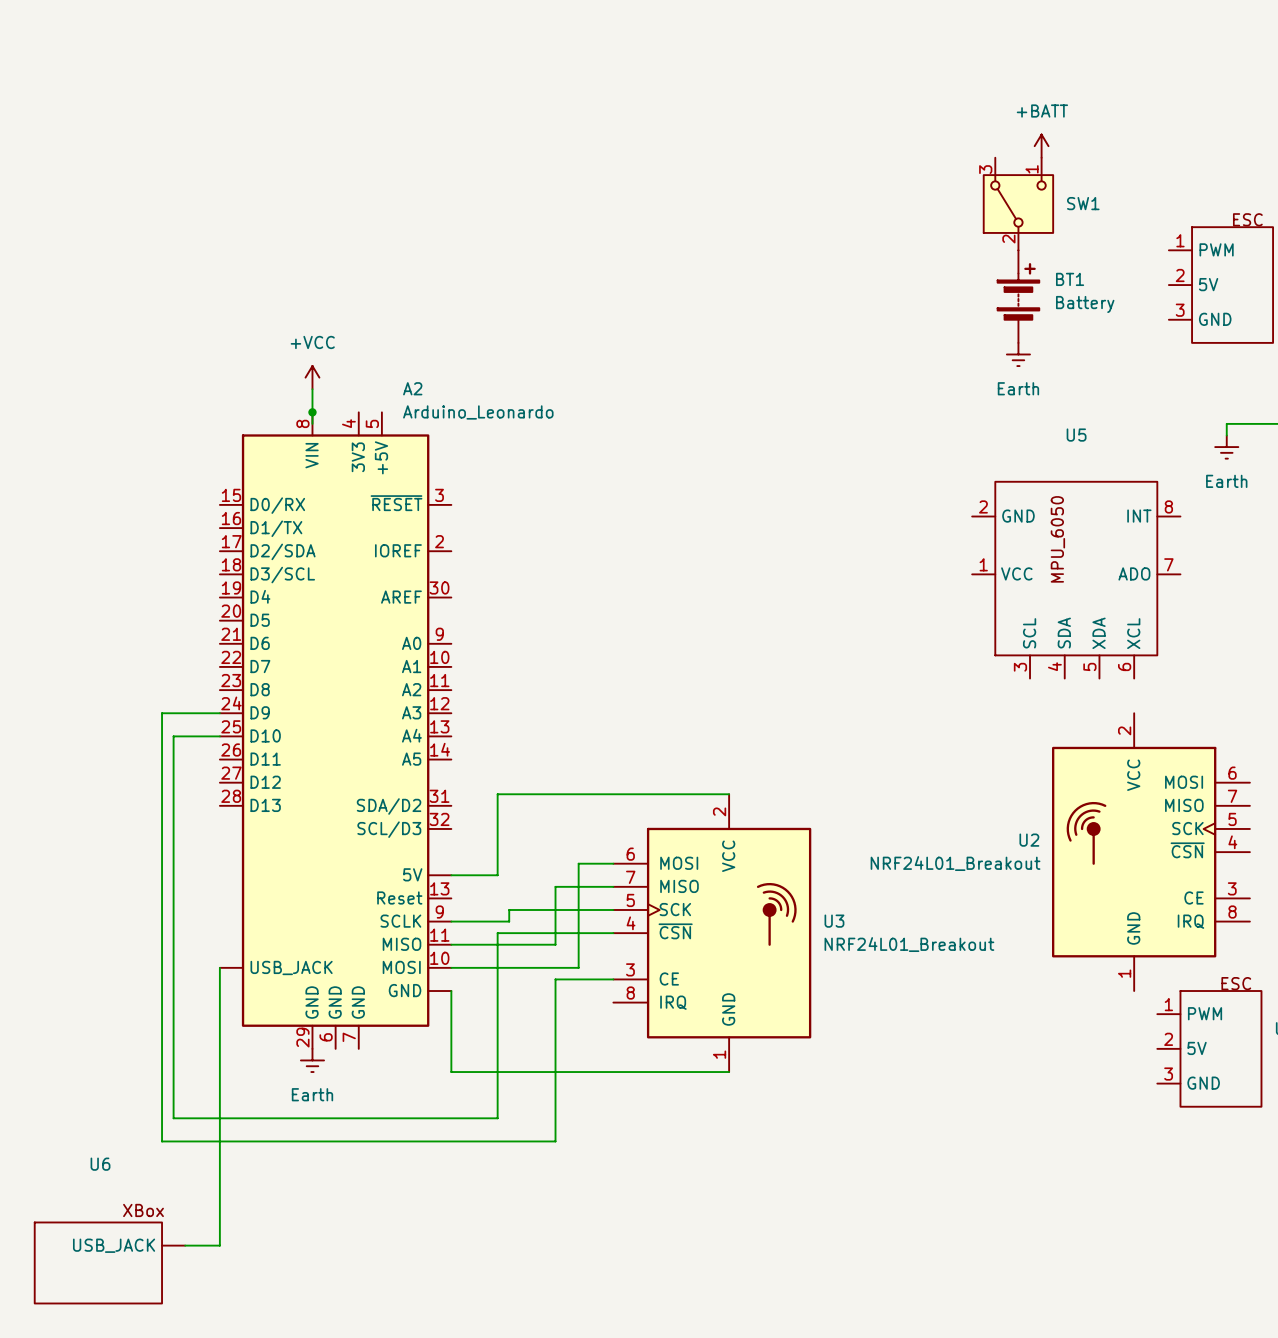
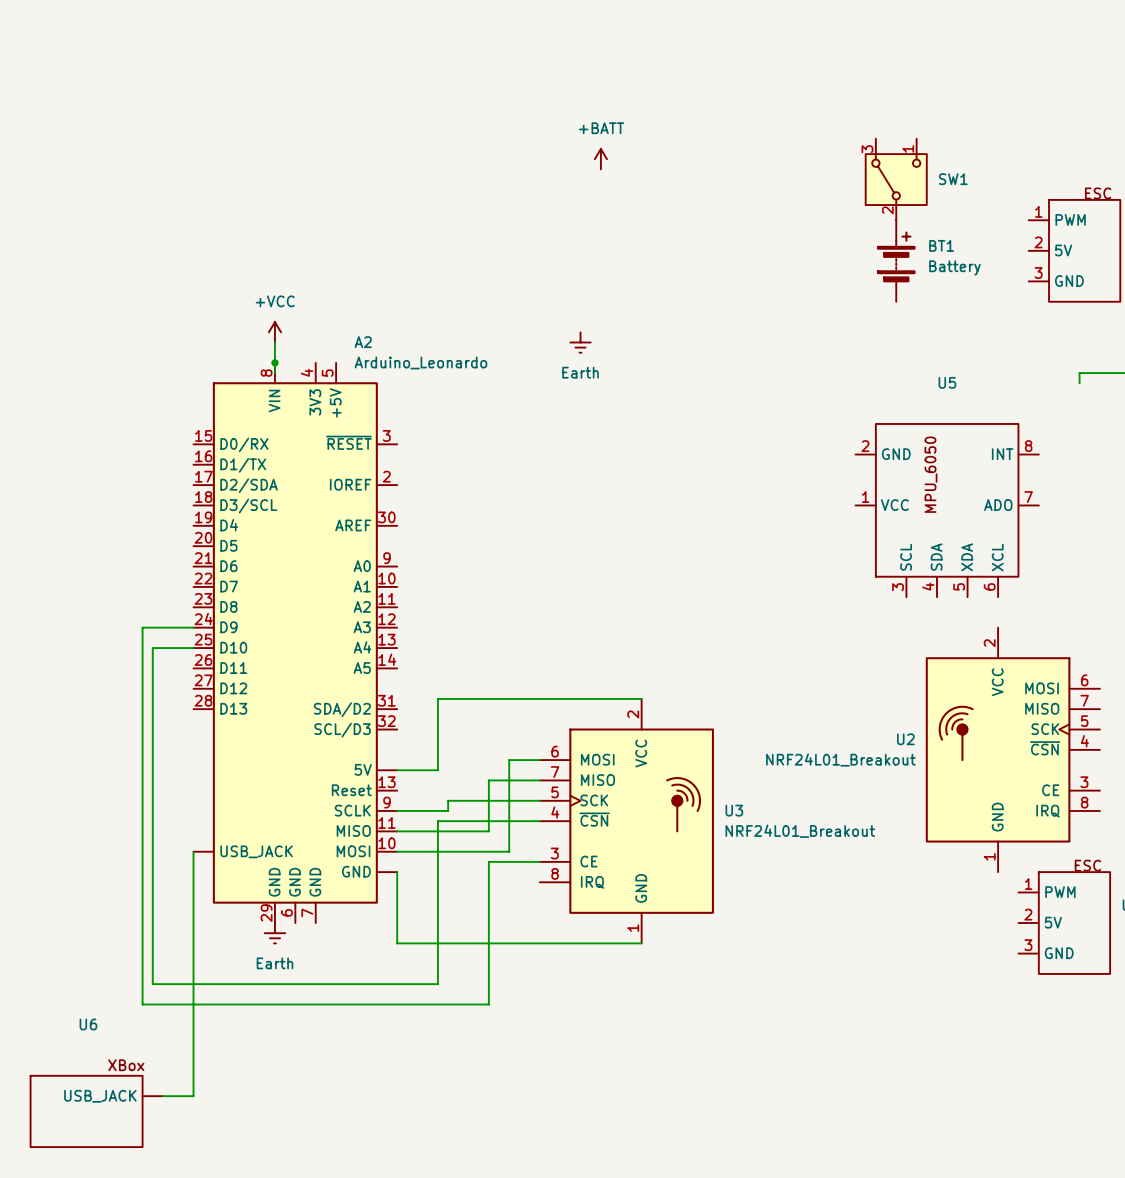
power symbol: +BATT (1041, 146) -> none
power symbol: none -> +BATT (600, 159)
power symbol: Earth (1018, 354) -> none
power symbol: none -> Earth (580, 342)
power symbol: Earth (1226, 447) -> none

